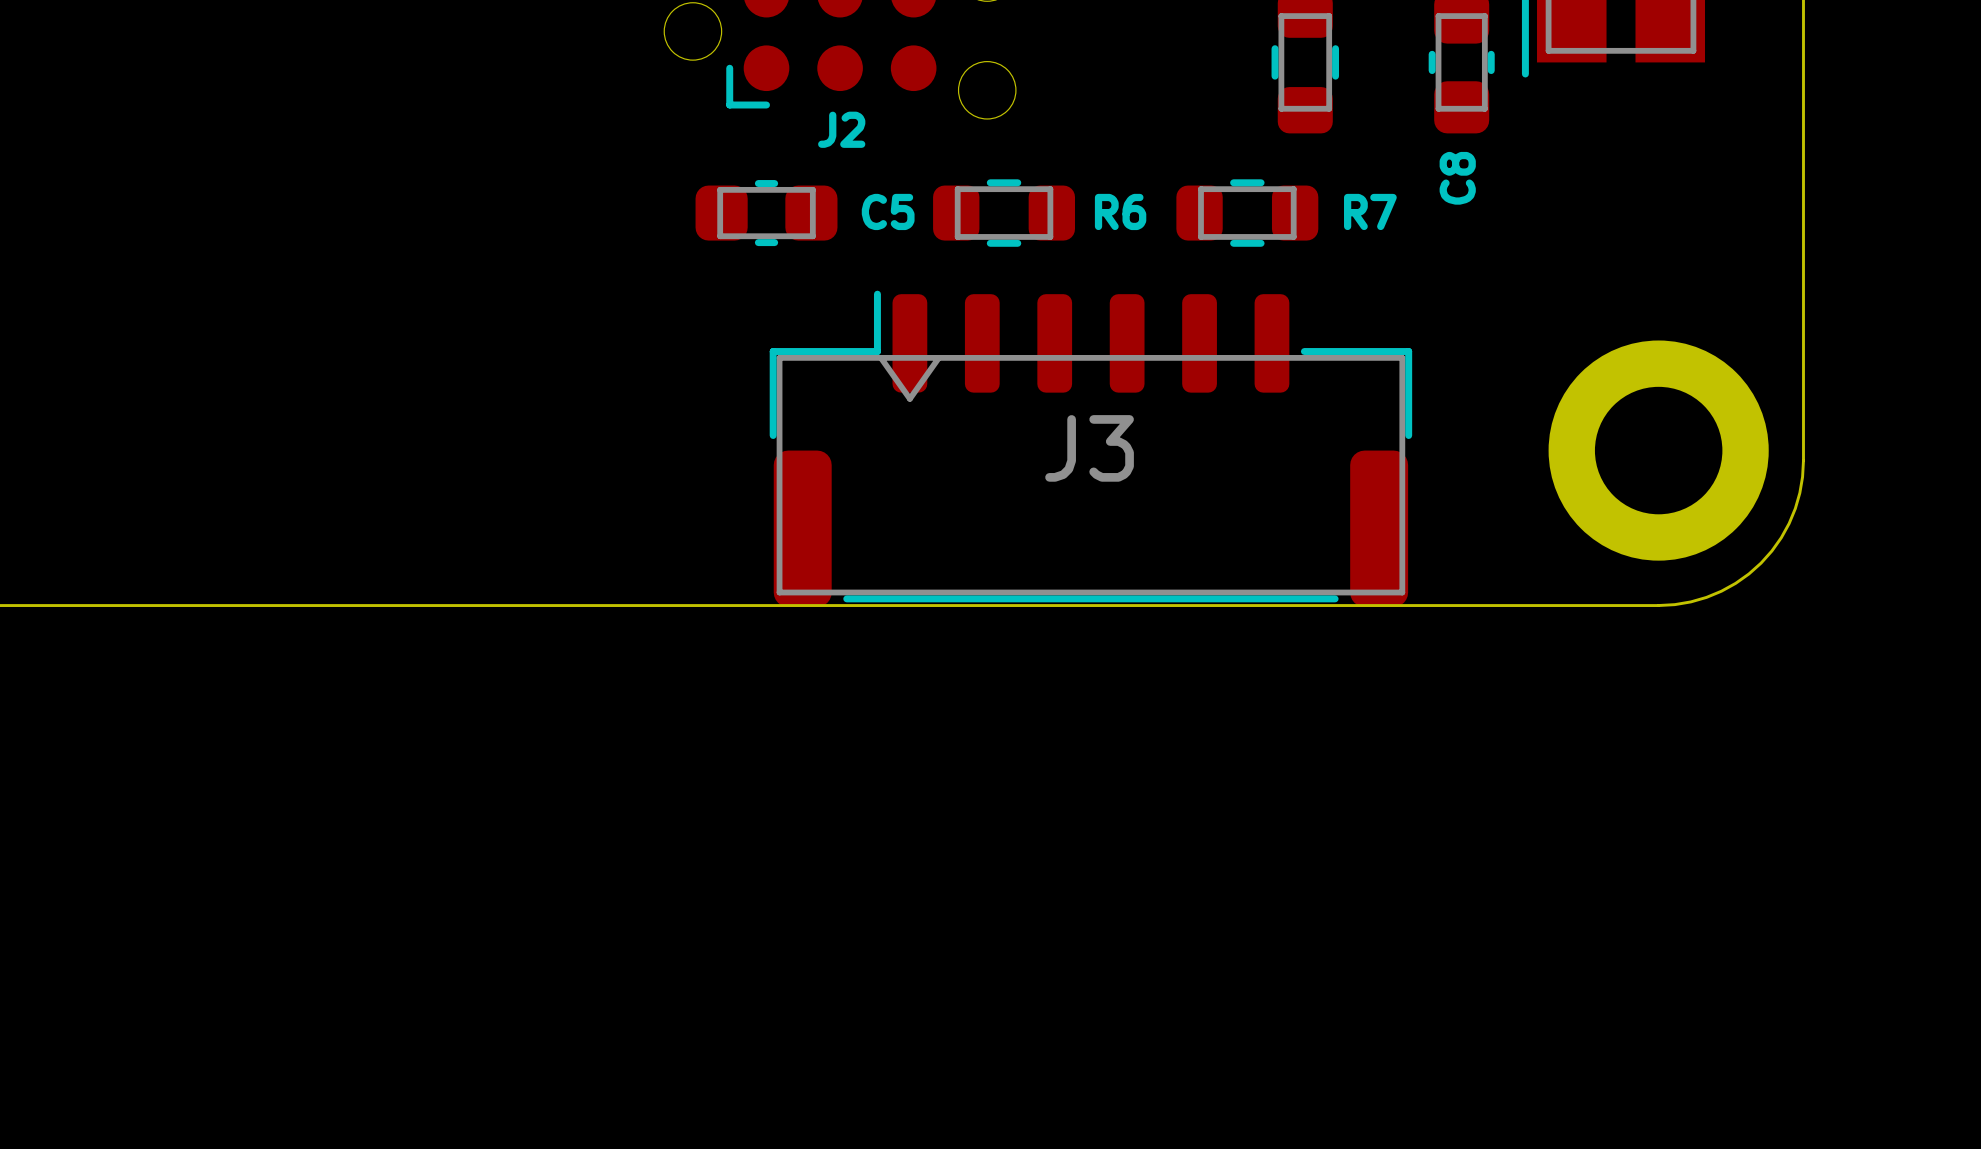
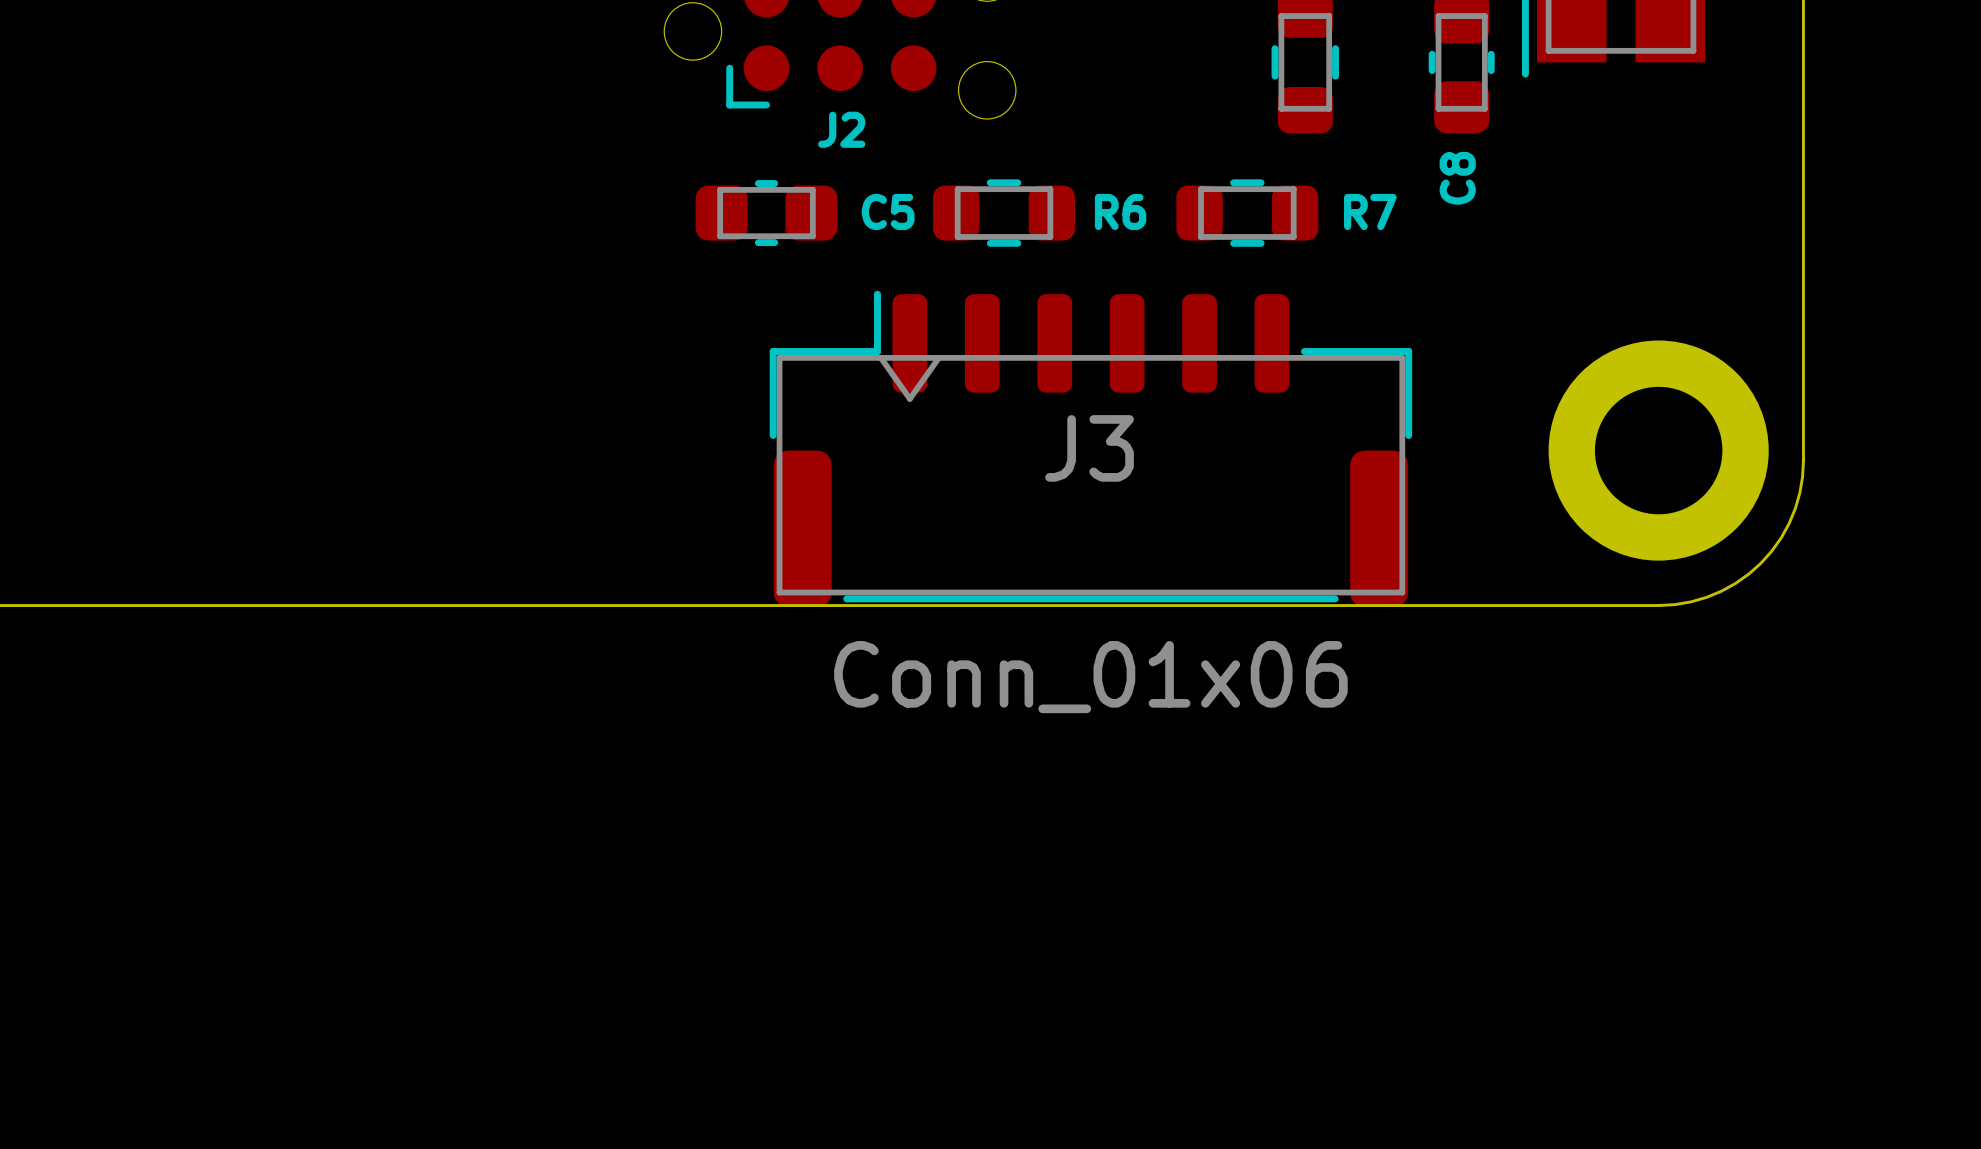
J3 value: none -> Conn_01x06 (1090, 677)

